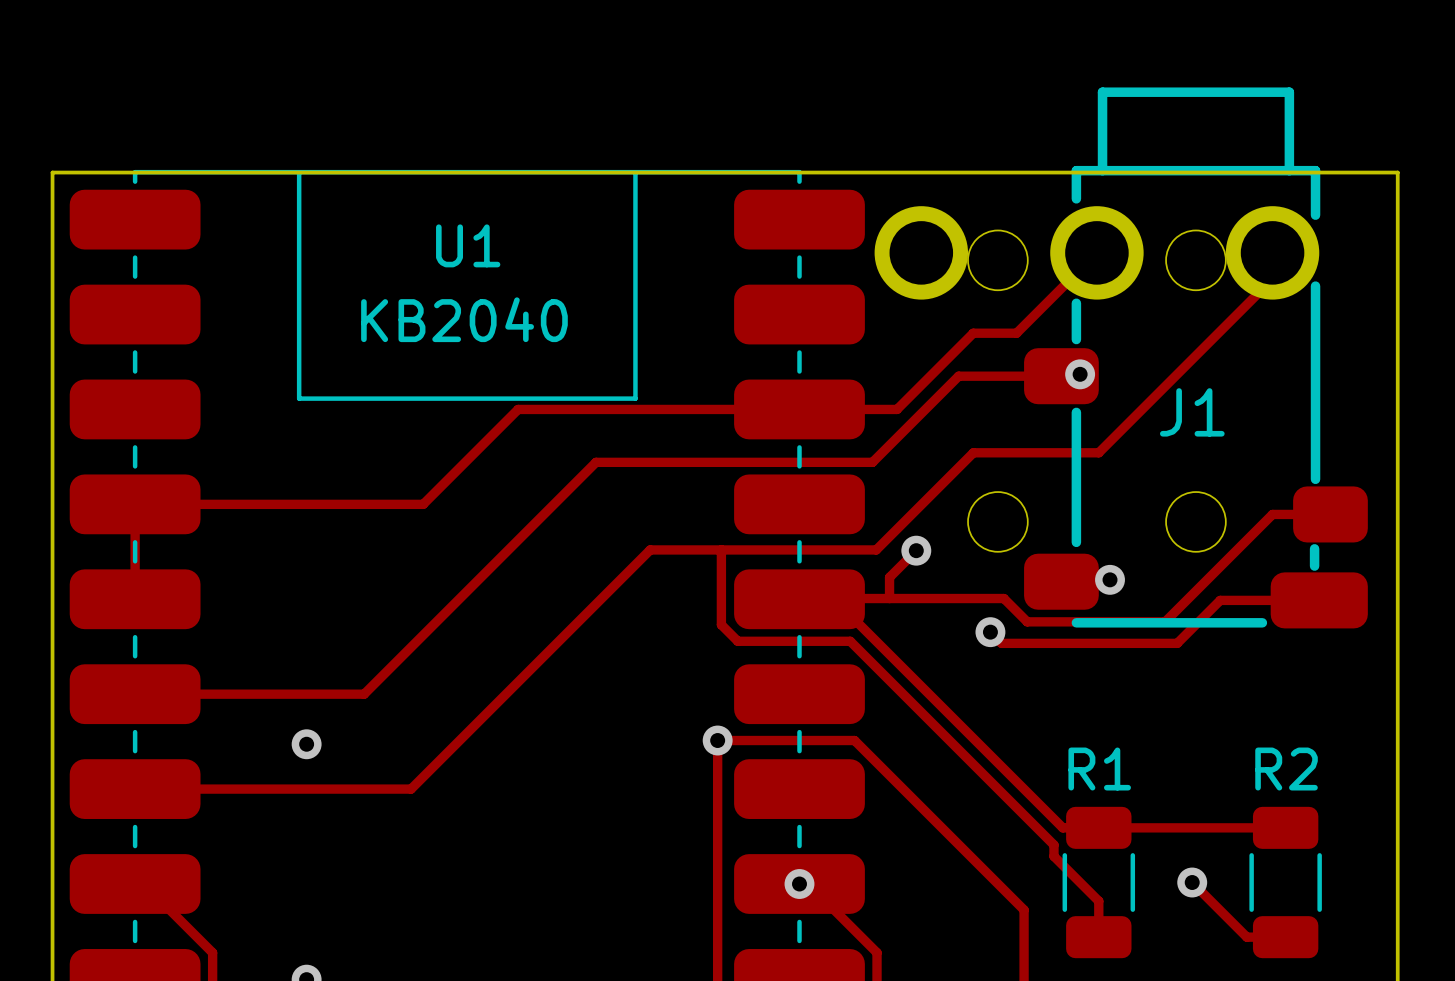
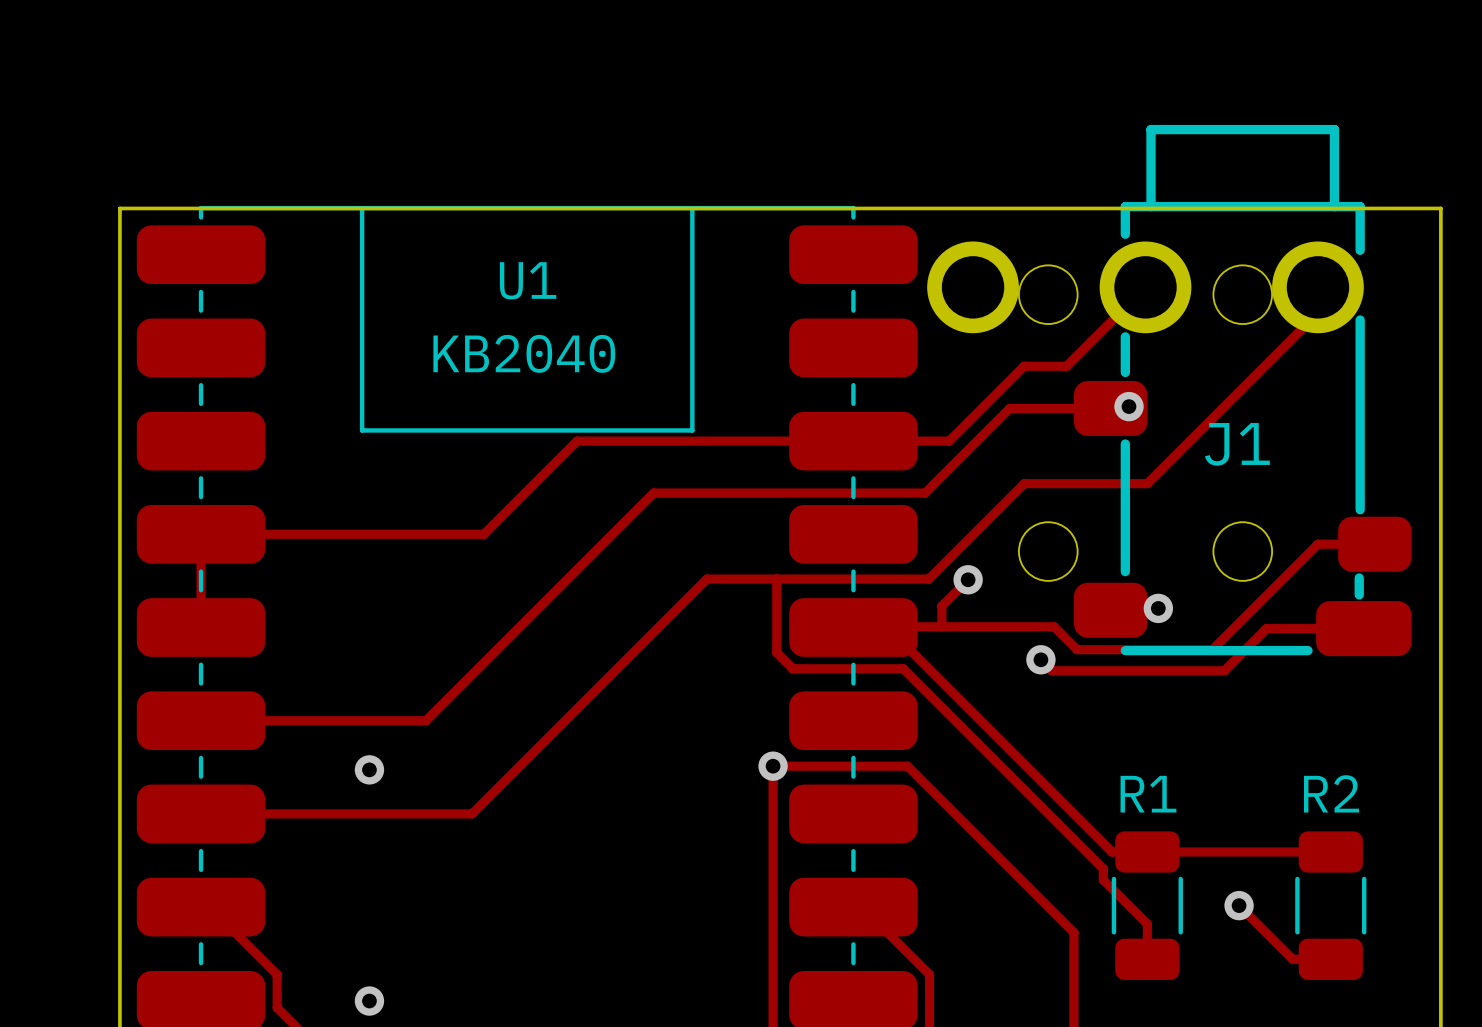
via: (799, 884) -> none

